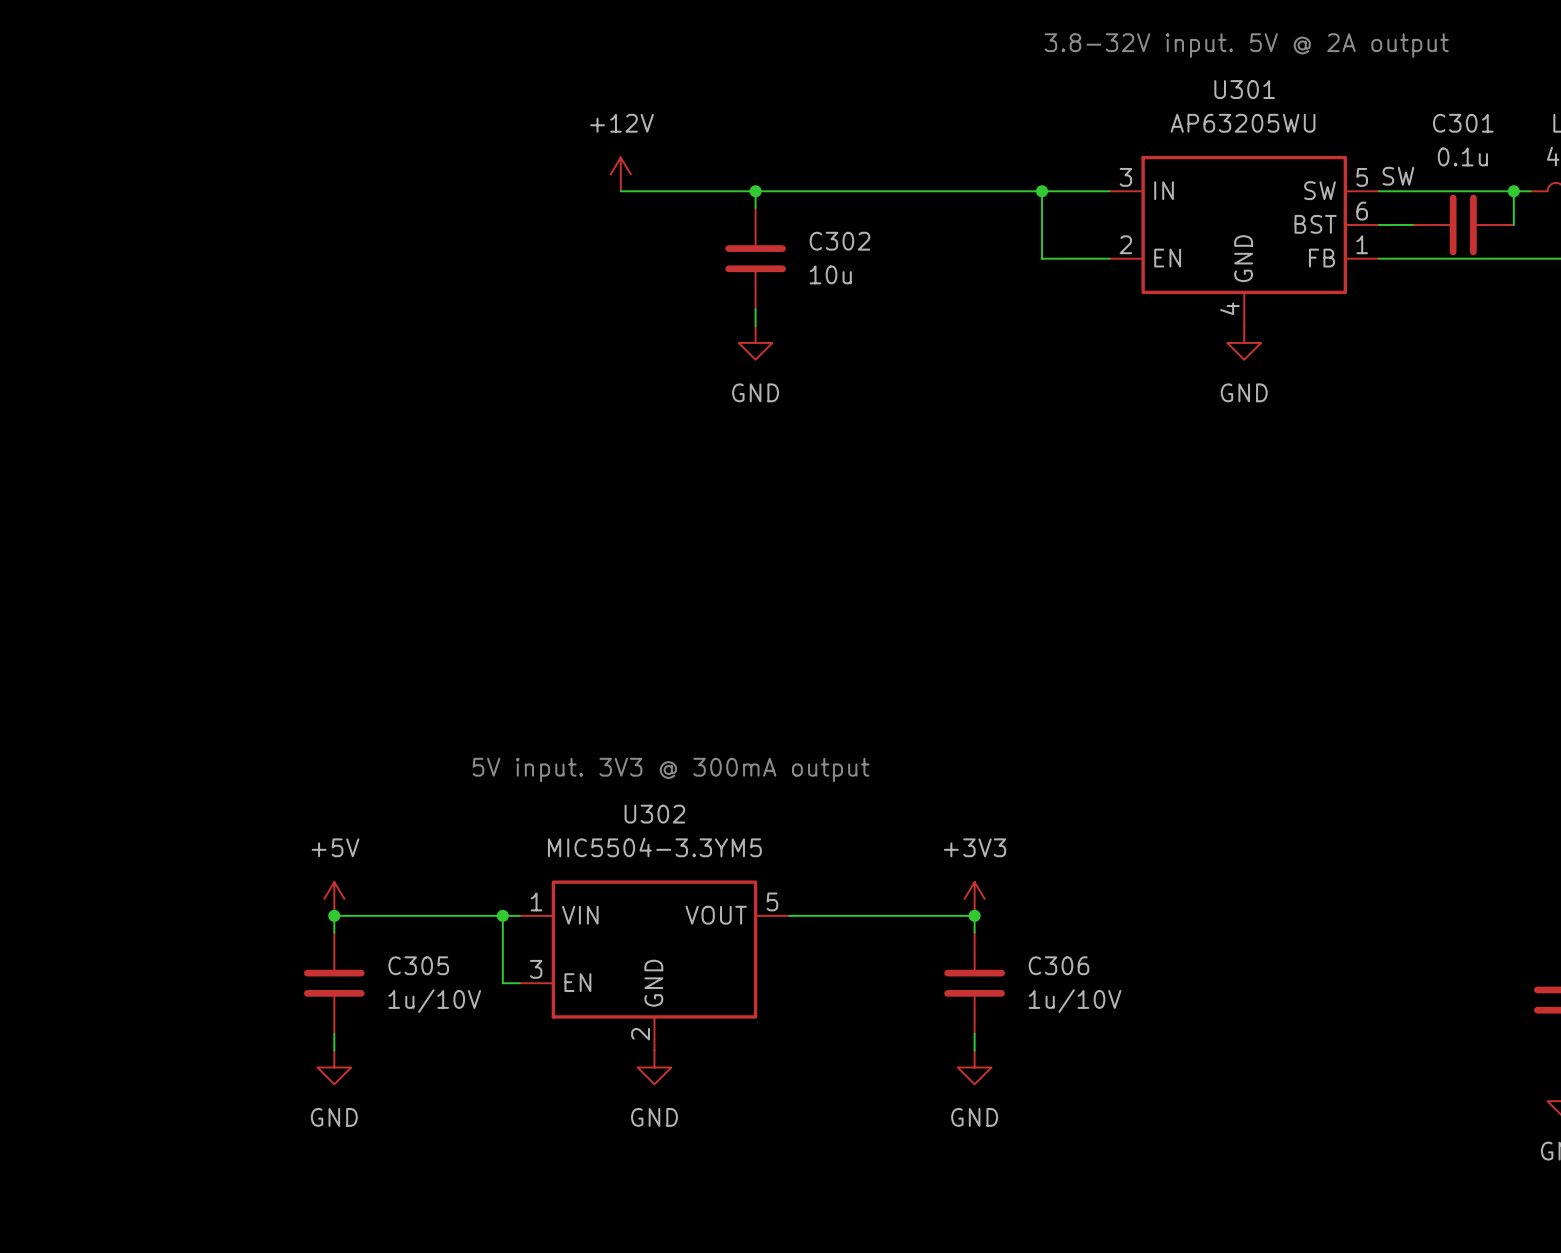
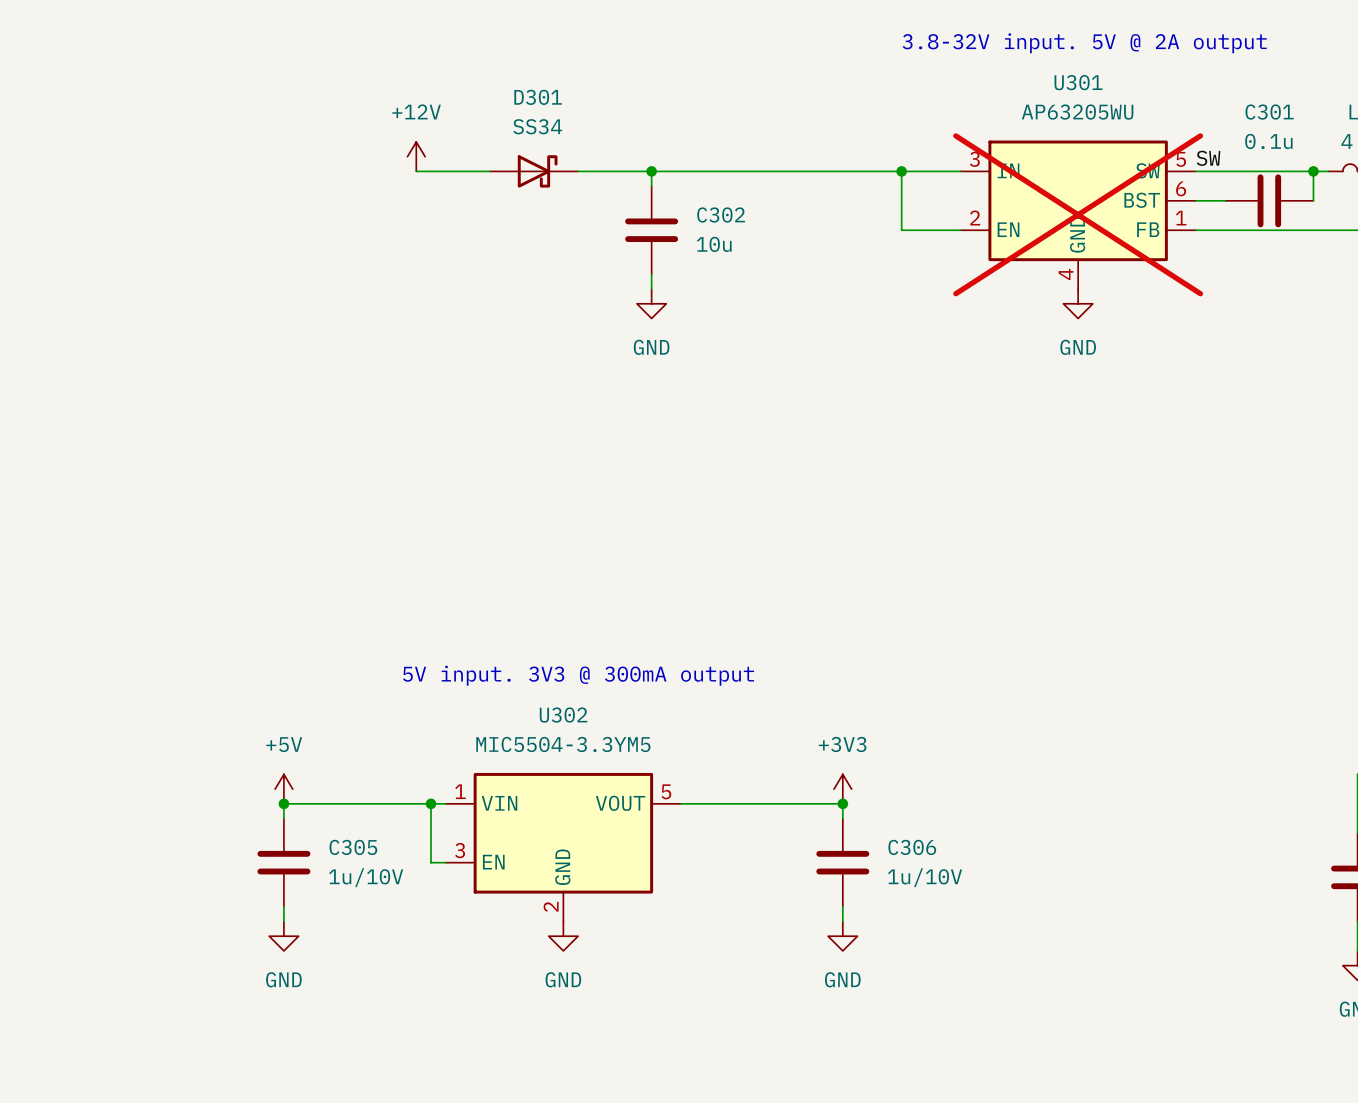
power symbol position: +12V (620, 174) -> +12V (416, 156)
wire: none -> (416, 171) (489, 171)
D301: none -> SS34 (533, 171)
U301 do-not-place cross: none -> (1078, 214)

